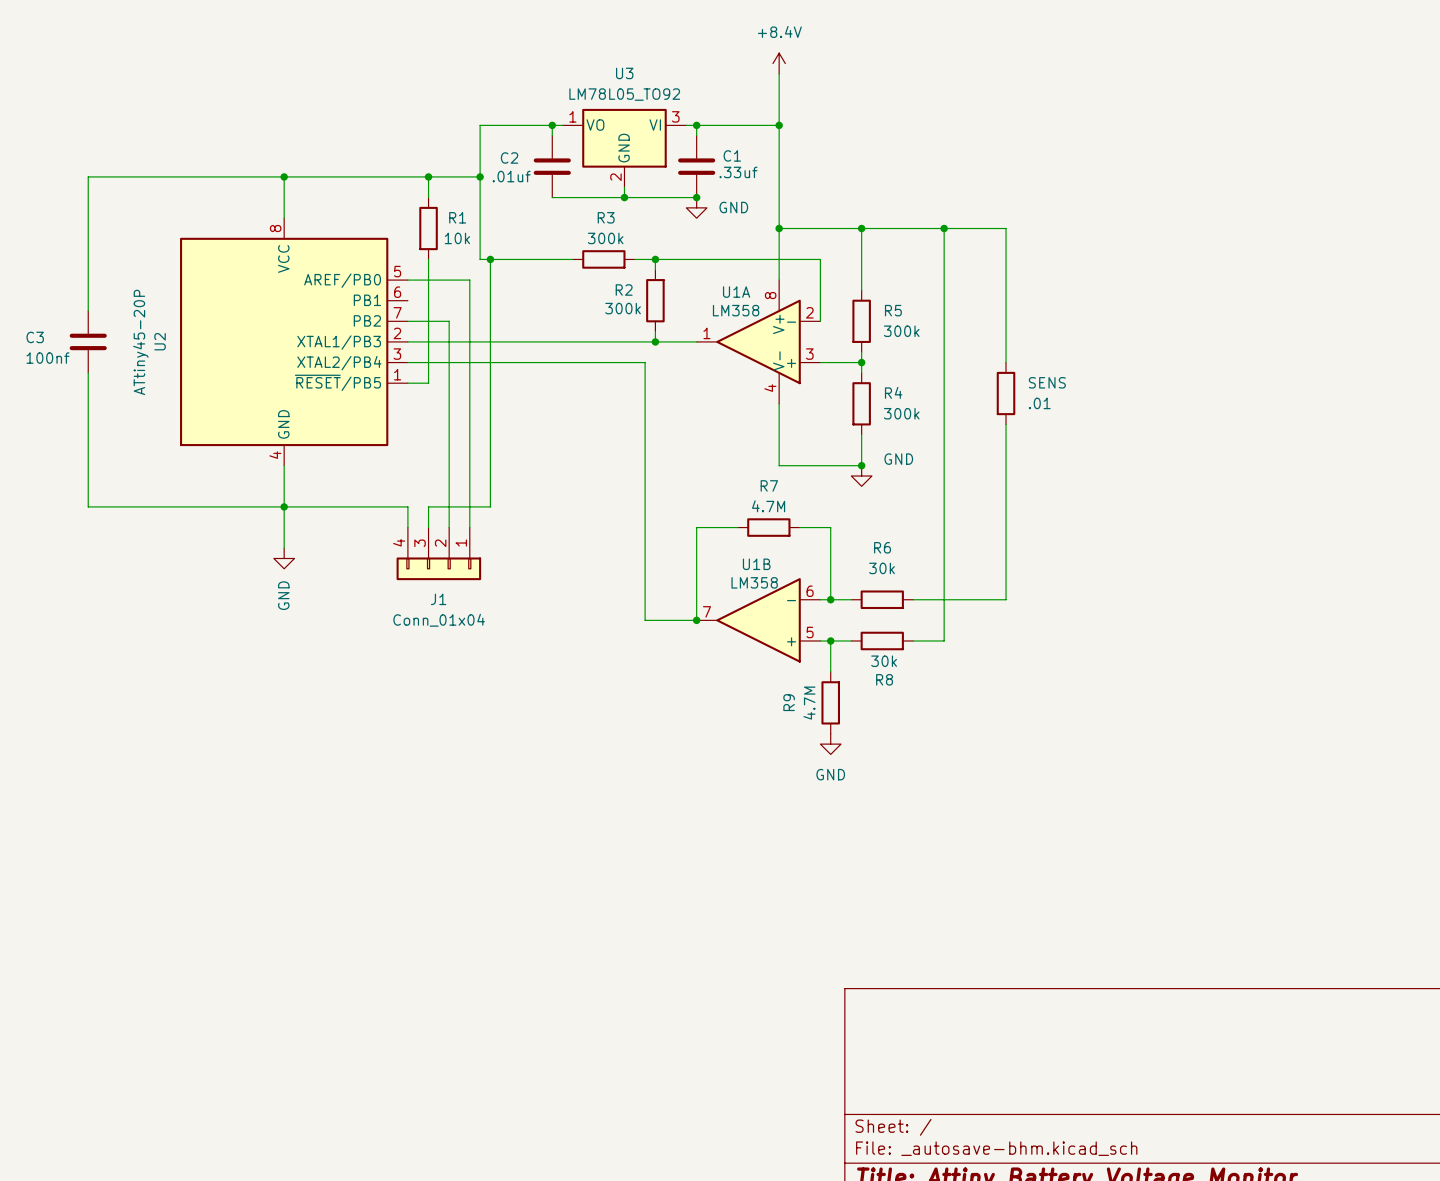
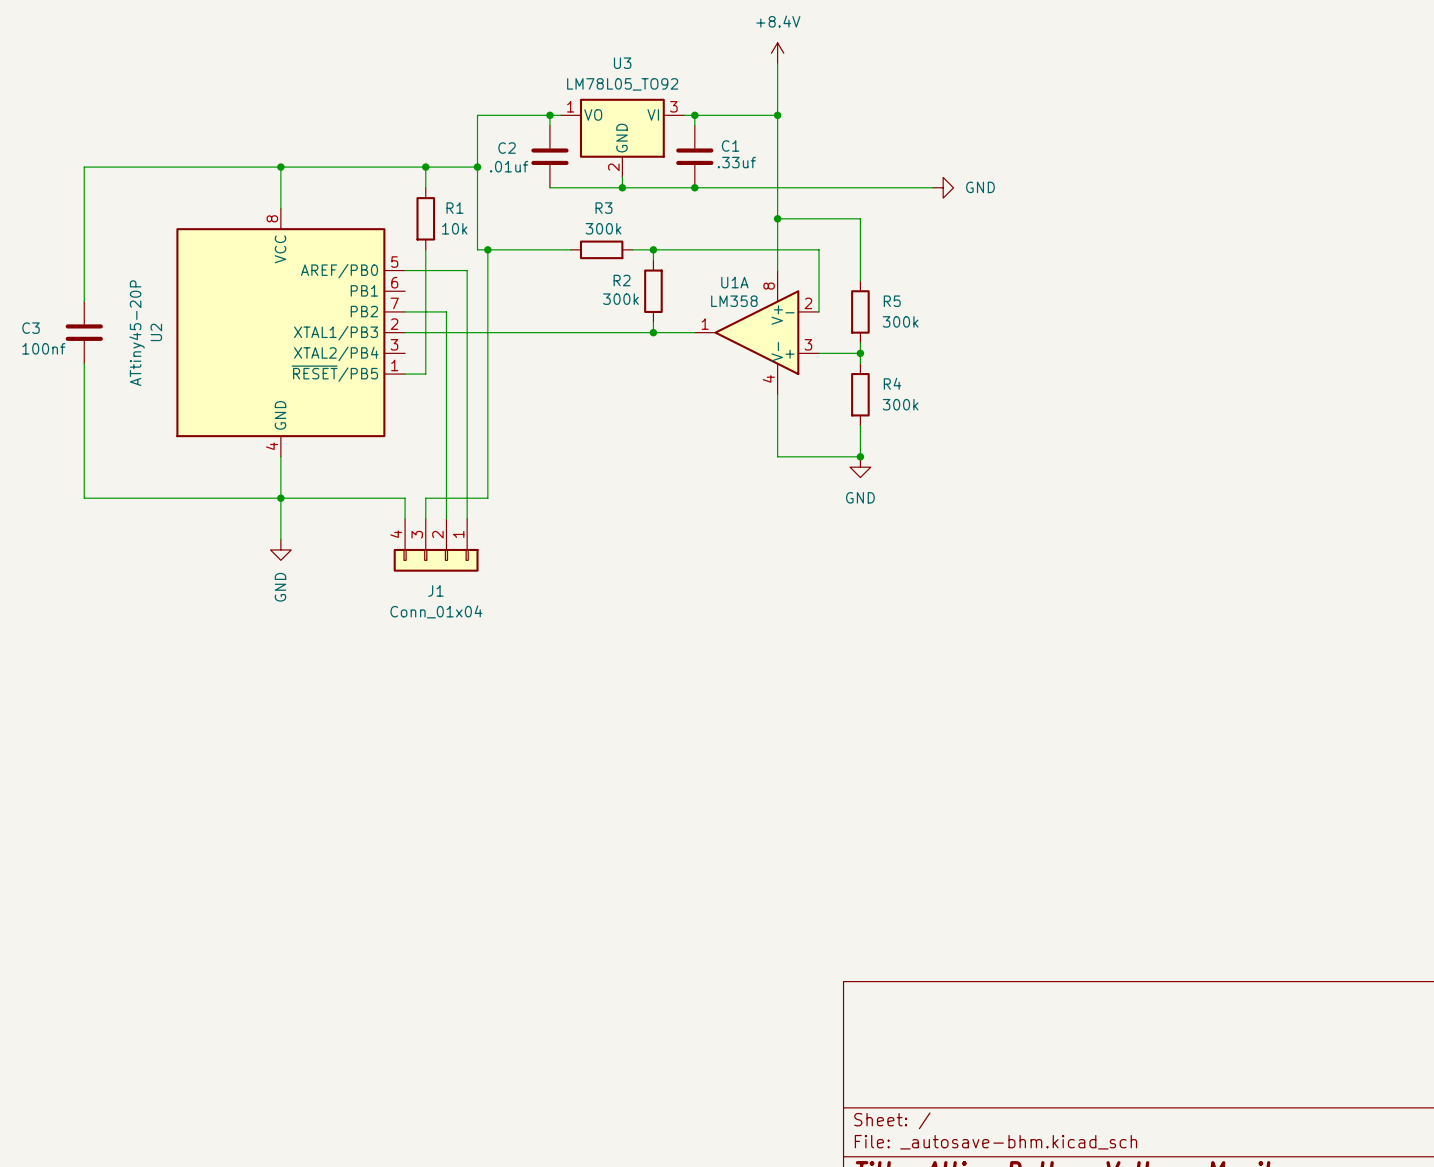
wire: none -> (694, 187) (932, 187)
power symbol: none -> GND (943, 187)
power symbol: GND (696, 207) -> none
wire: (861, 228) (1006, 228) (1006, 362) -> none
junction: (861, 228) -> none
wire: (944, 228) (944, 640) (913, 640) -> none
junction: (944, 228) -> none
wire: (407, 362) (645, 362) (645, 620) (696, 620) (696, 527) (737, 527) -> none
SENS: .01 (1006, 393) -> none
wire: (1006, 424) (1006, 599) (913, 599) -> none
power symbol text position: GND (898, 459) -> GND (860, 497)
R7: 4.7M (768, 527) -> none
wire: (799, 527) (830, 527) (830, 599) -> none
wire: (820, 599) (851, 599) -> none
junction: (830, 599) -> none
R6: 30k (882, 599) -> none
junction: (696, 620) -> none
U1B: LM358 (758, 620) -> none
wire: (820, 640) (851, 640) -> none
wire: (830, 640) (830, 671) -> none
junction: (830, 640) -> none
R8: 30k (882, 640) -> none
R9: 4.7M (830, 702) -> none
power symbol: GND (830, 744) -> none

